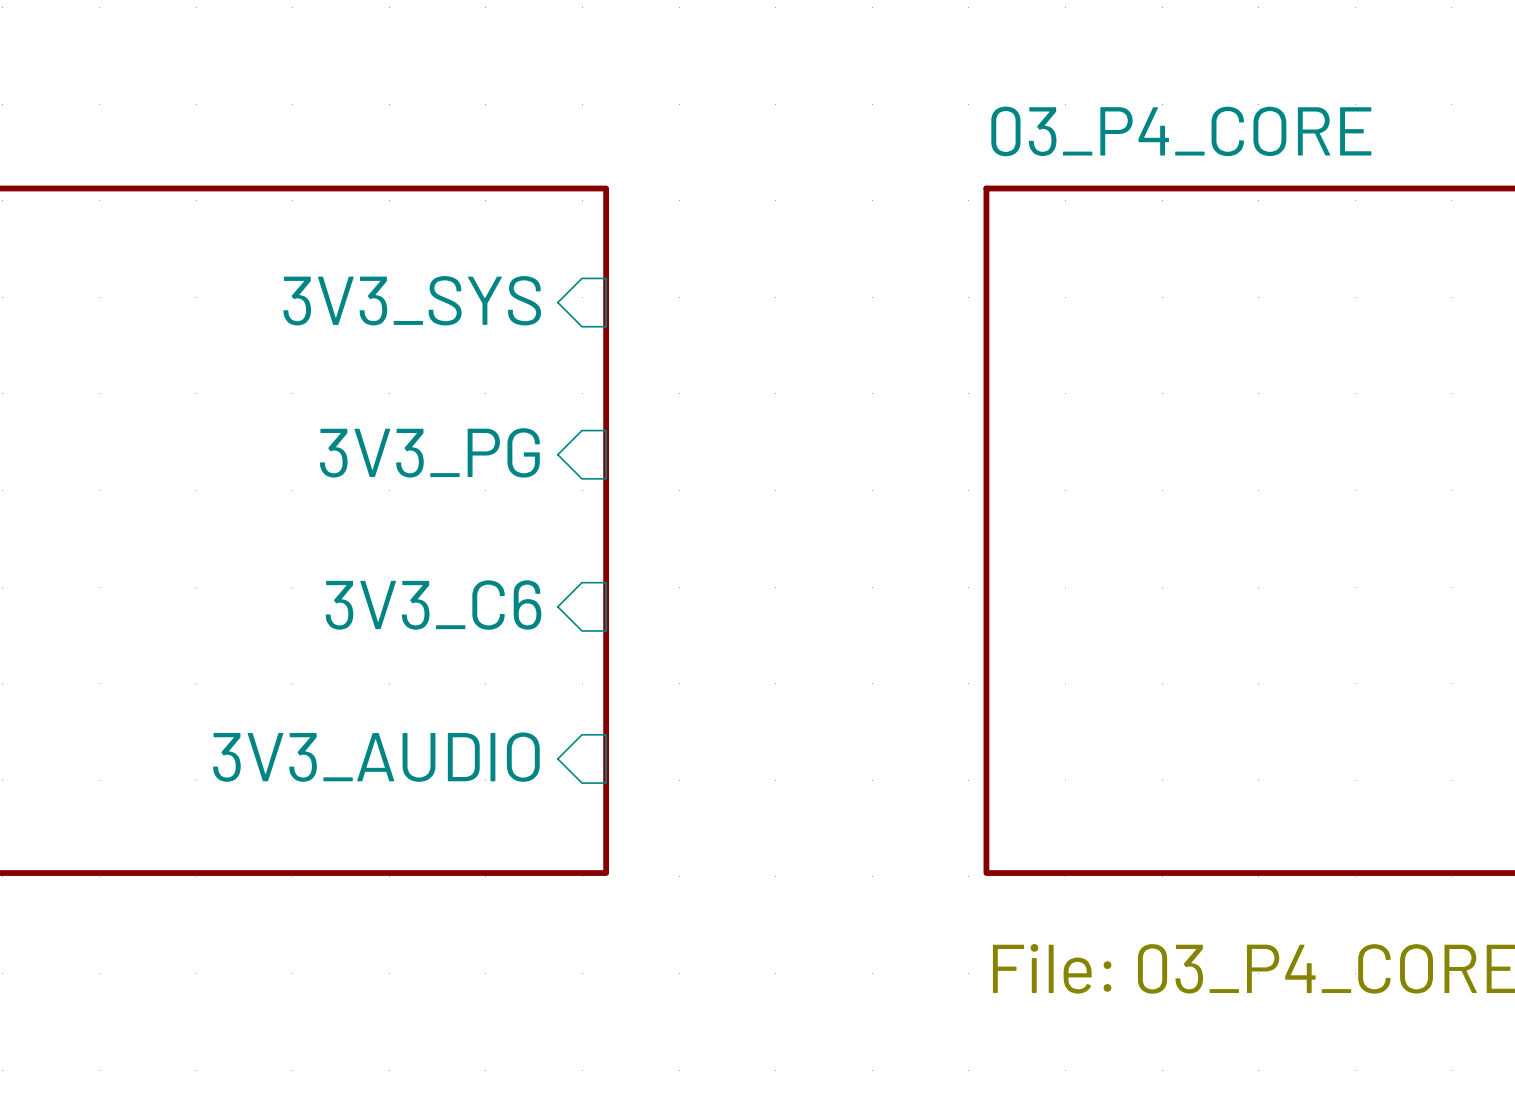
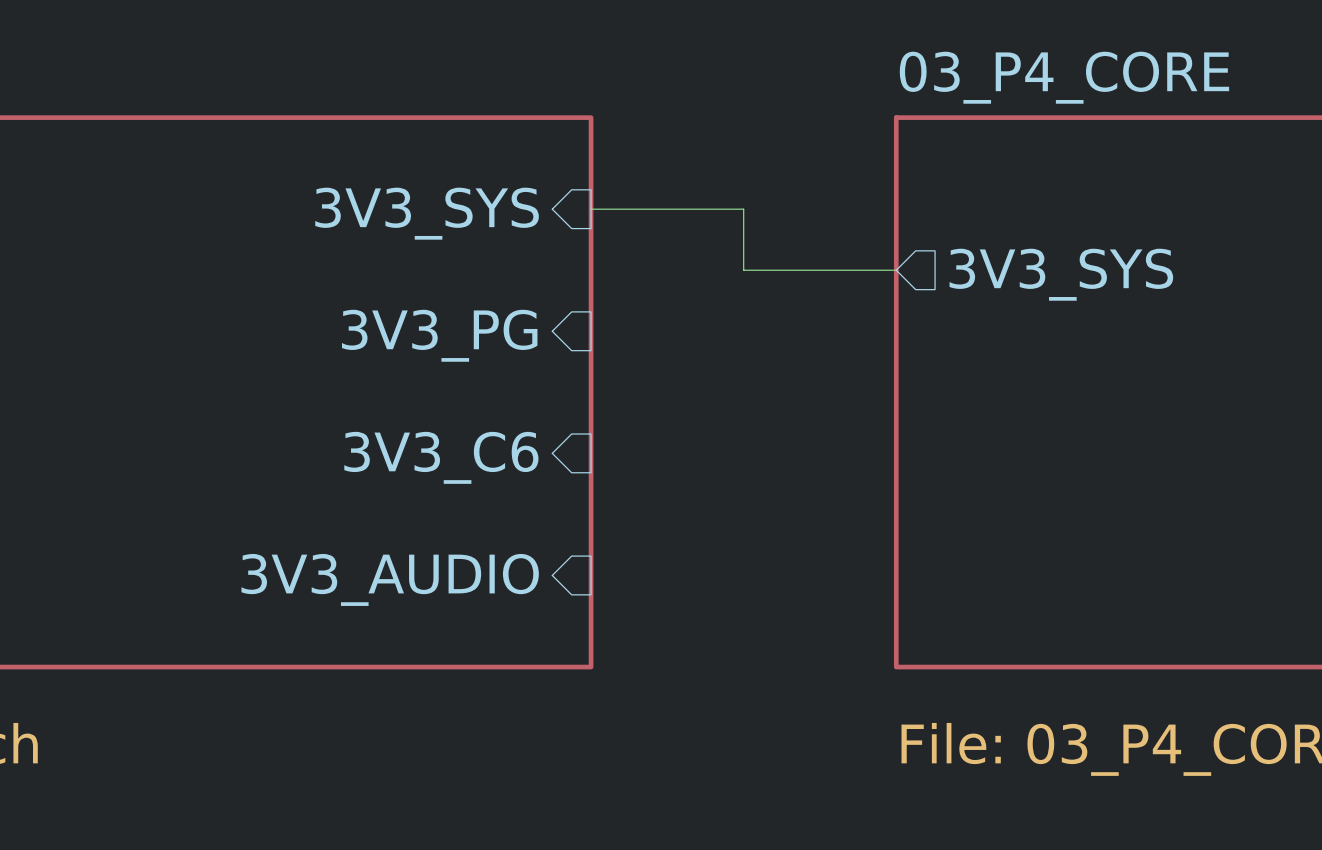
wire: none -> (591, 209) (743, 209) (743, 270) (896, 270)
sheet pin: none -> 3V3_SYS (1061, 274)

